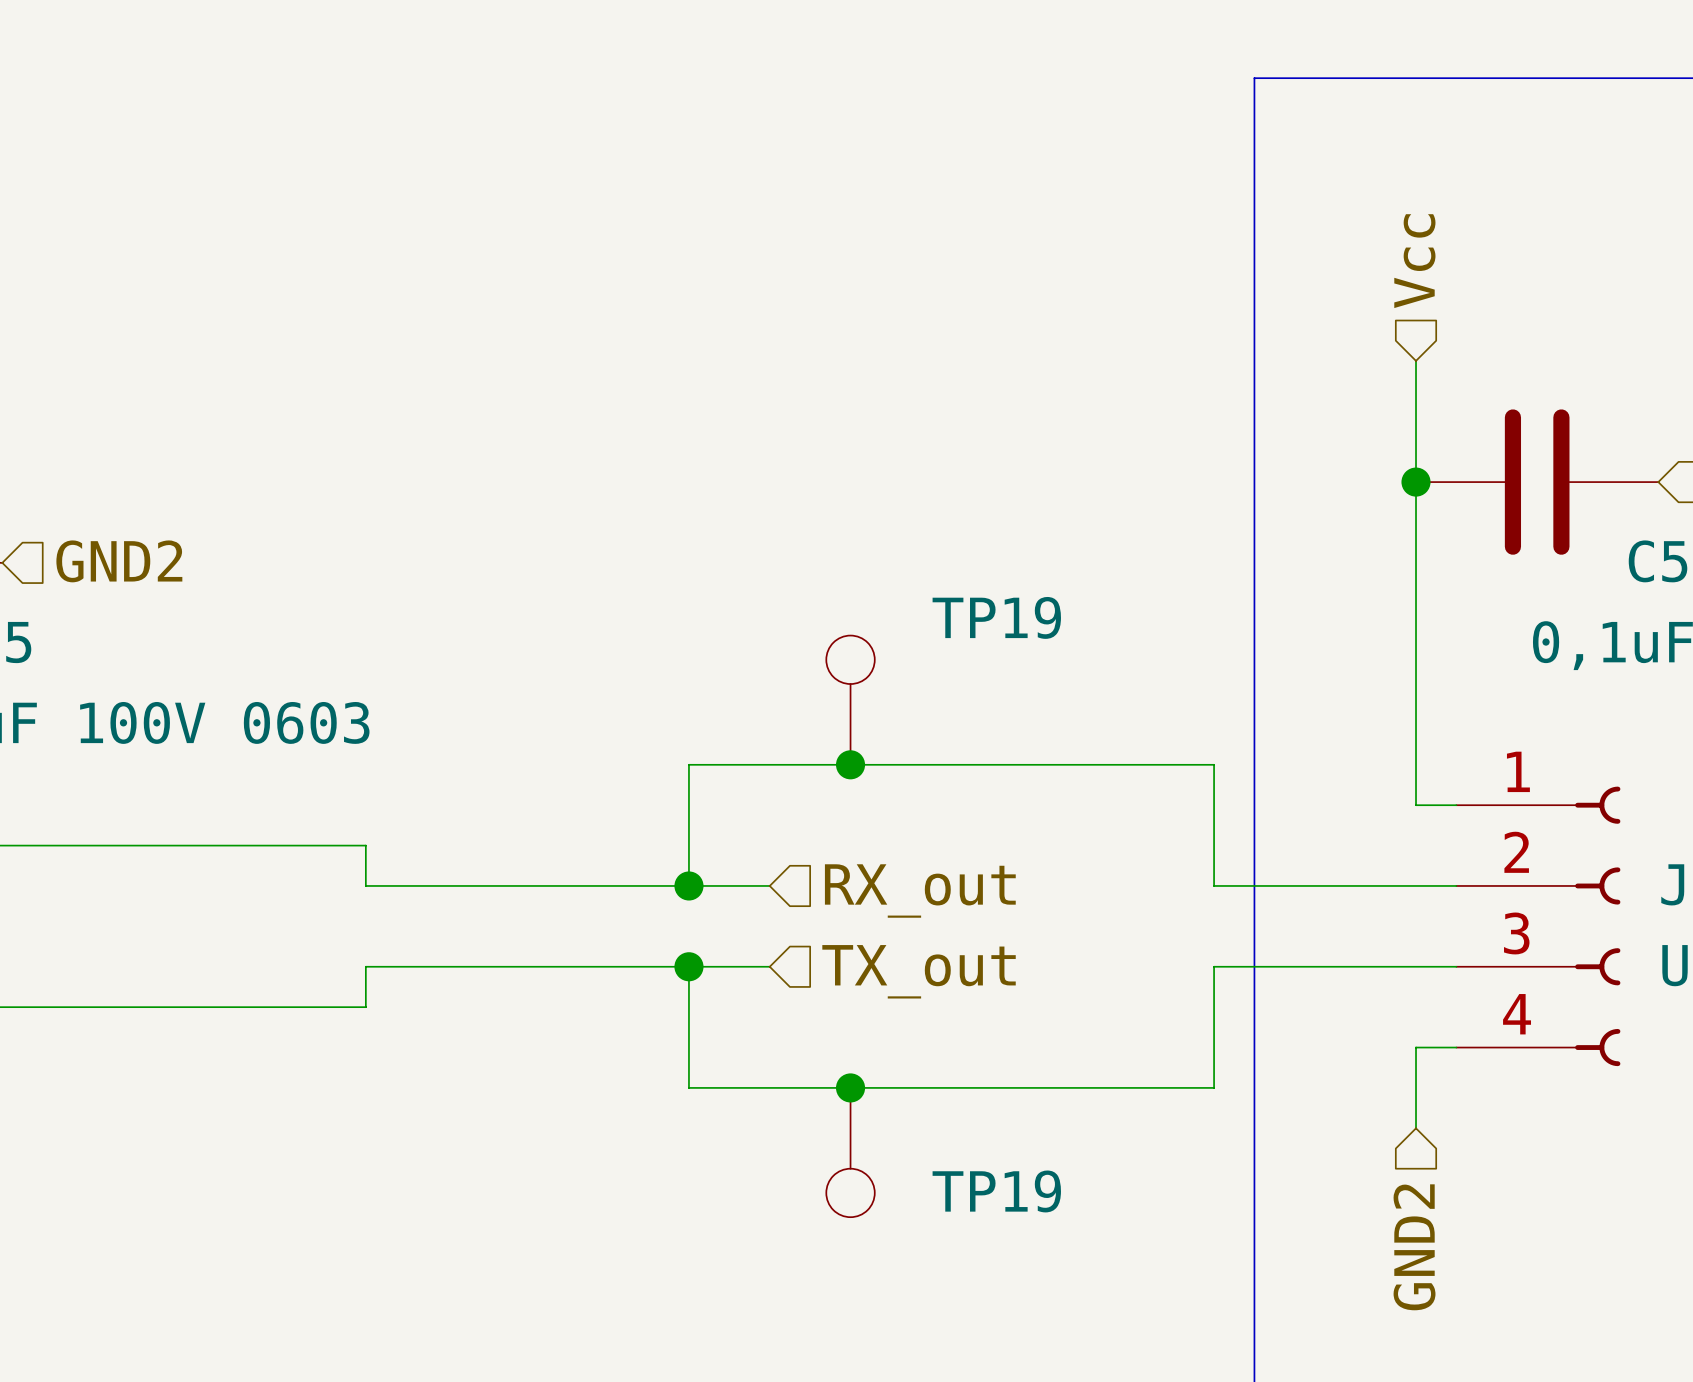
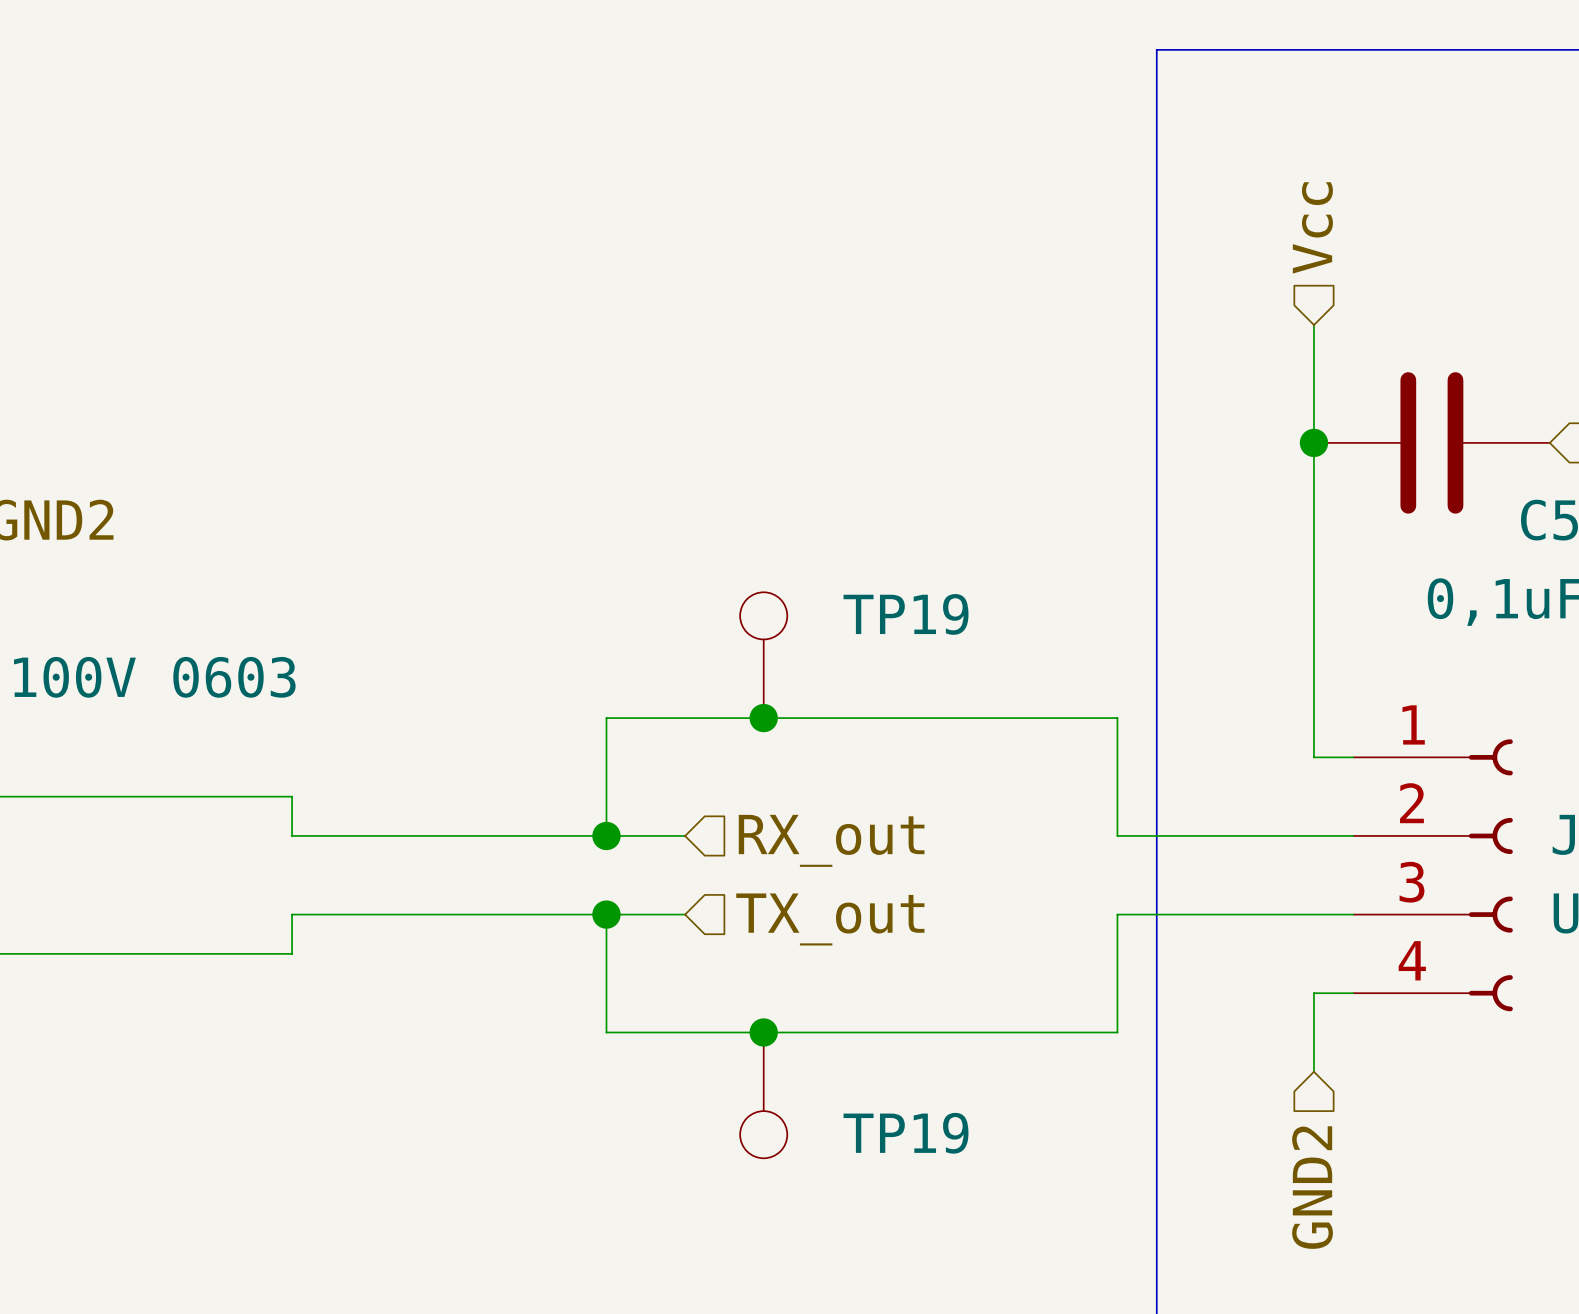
TP19 name position: TP19 (996, 617) -> TP19 (906, 614)

